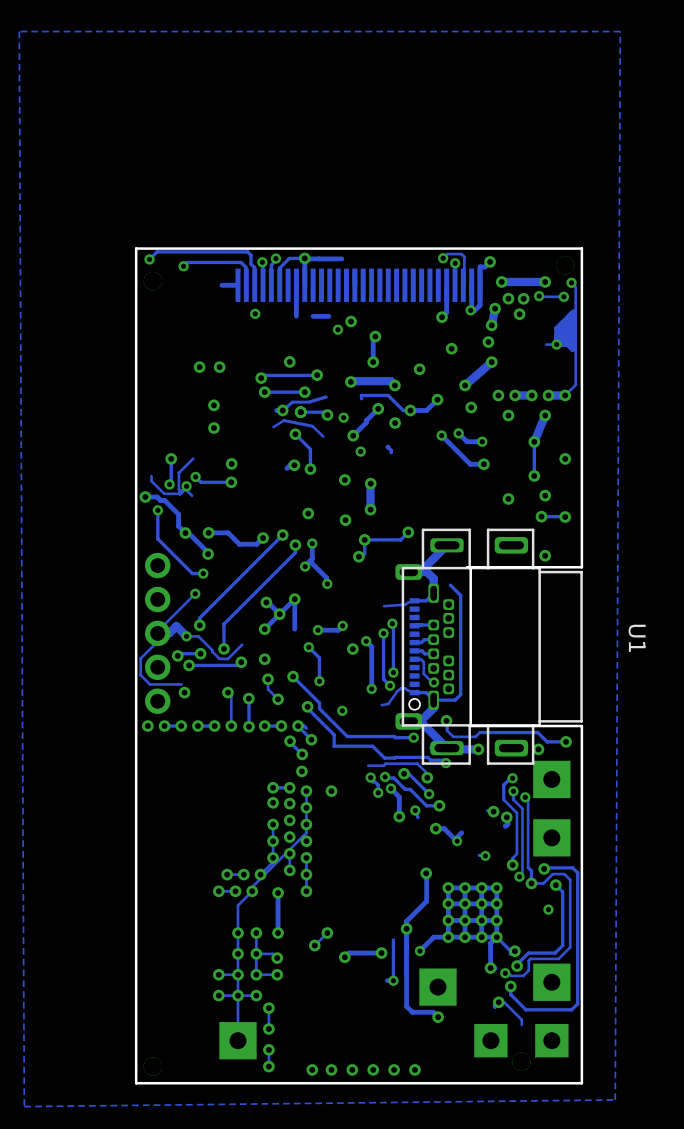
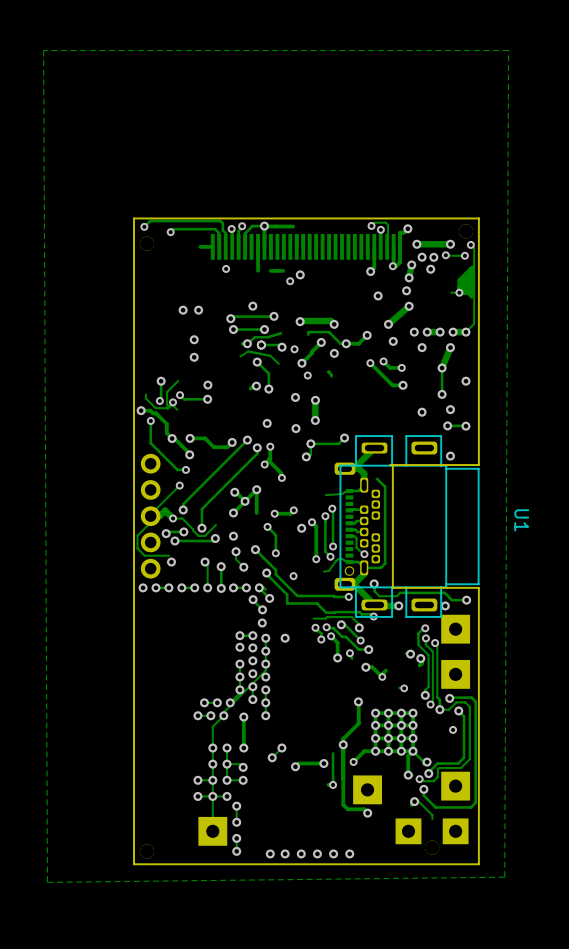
track: (375, 336) (373, 338) (373, 362) -> none
via: (375, 336) -> none
via: (373, 362) -> none
via: (419, 369) -> none

